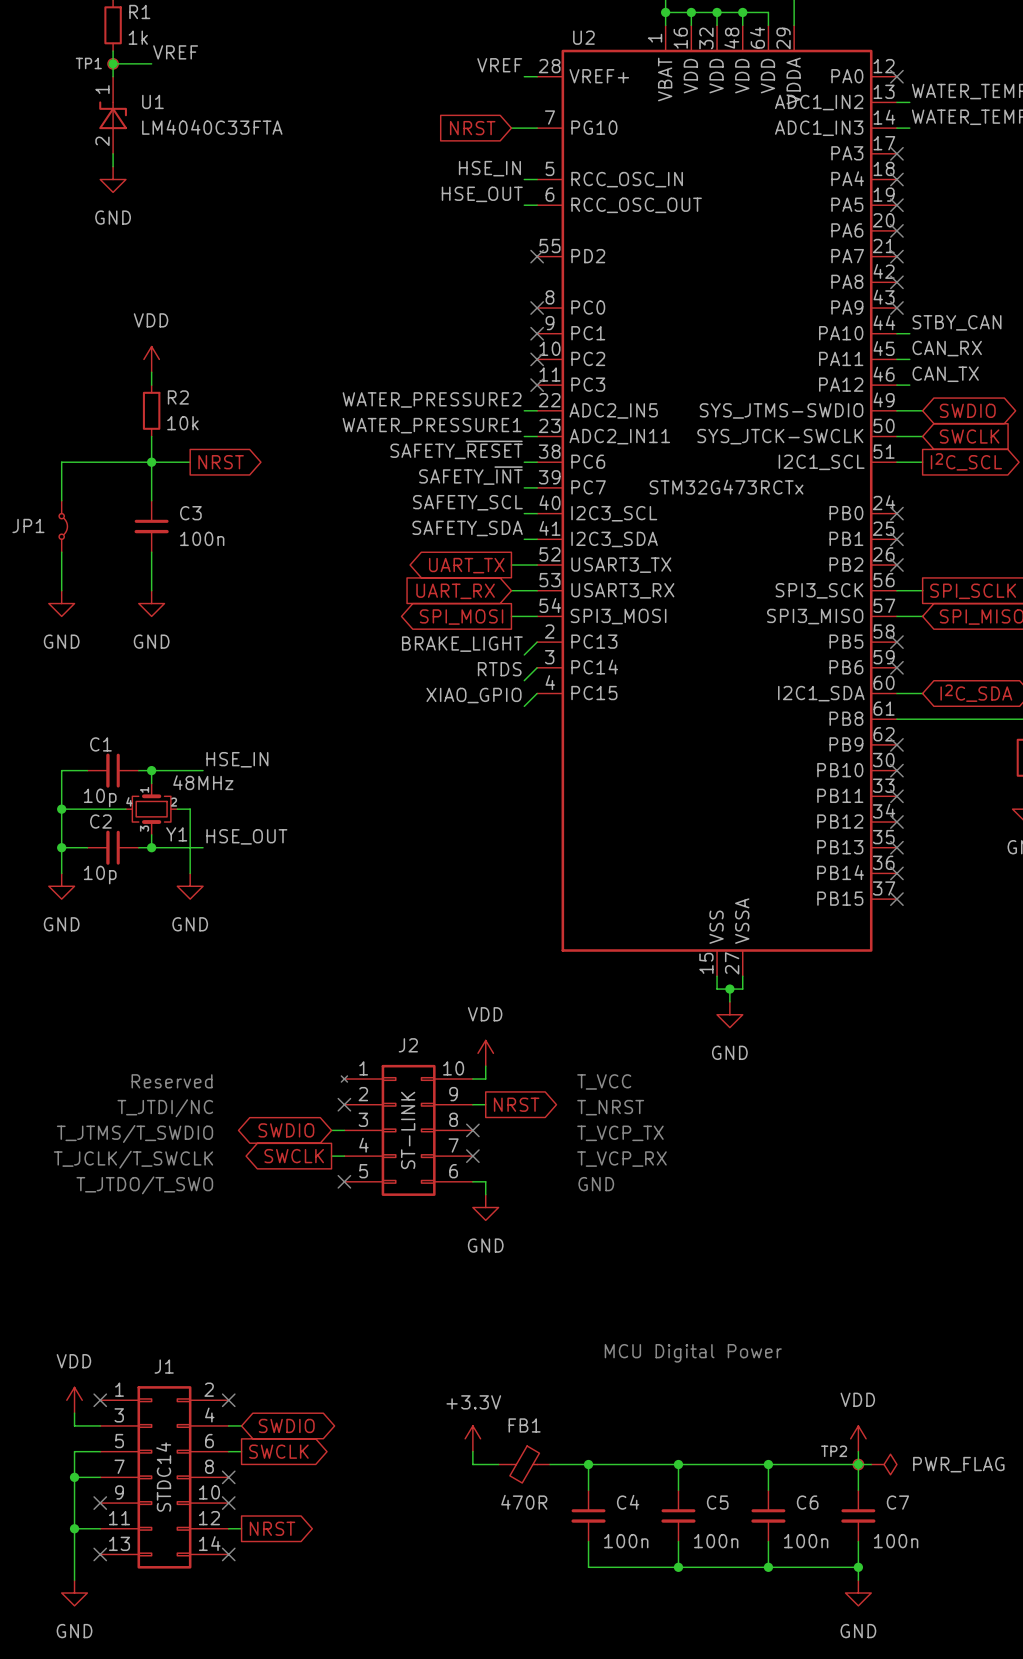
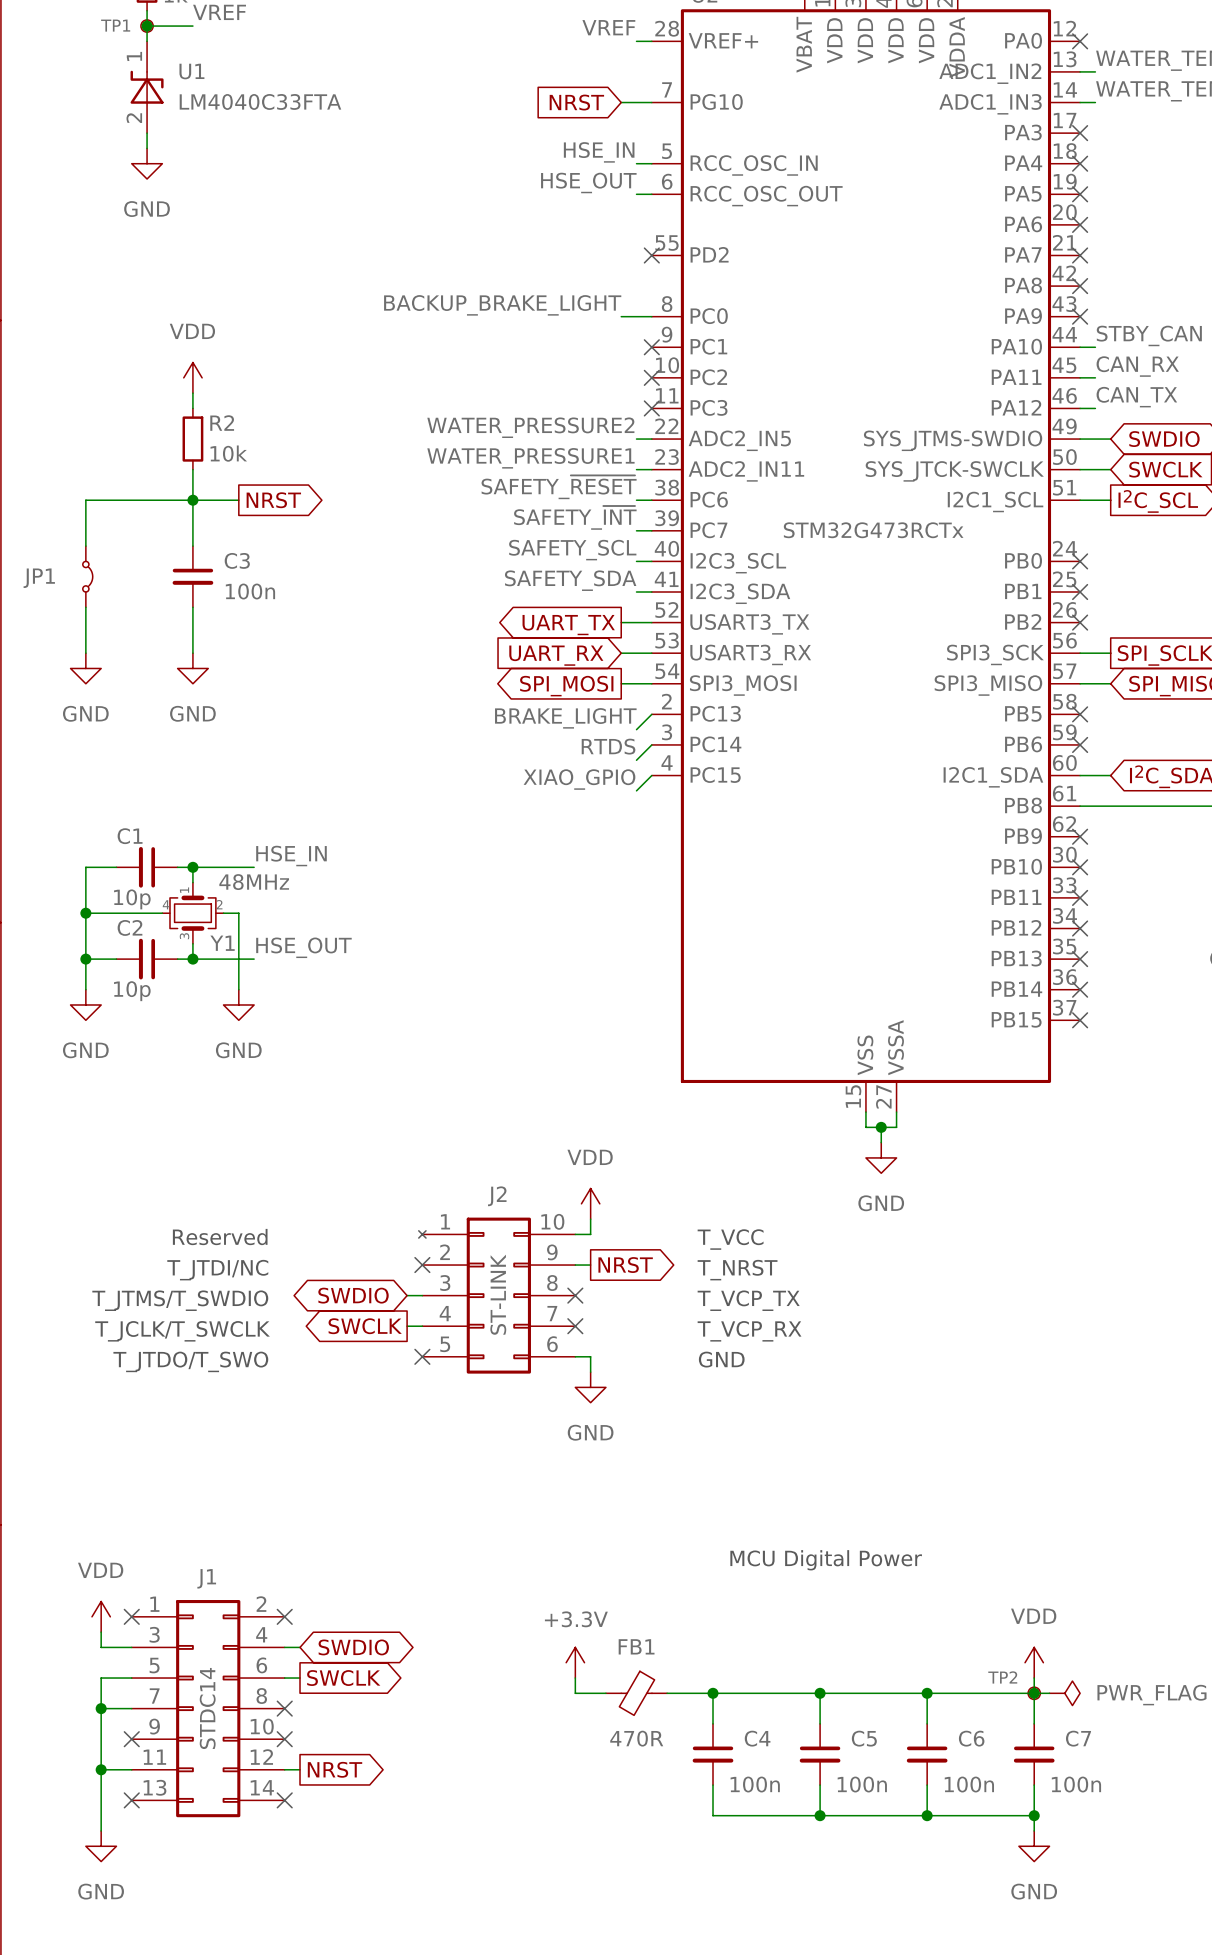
label: none -> BACKUP_BRAKE_LIGHT (502, 305)
wire: none -> (621, 316) (651, 316)
no-connect mark: (537, 308) -> none

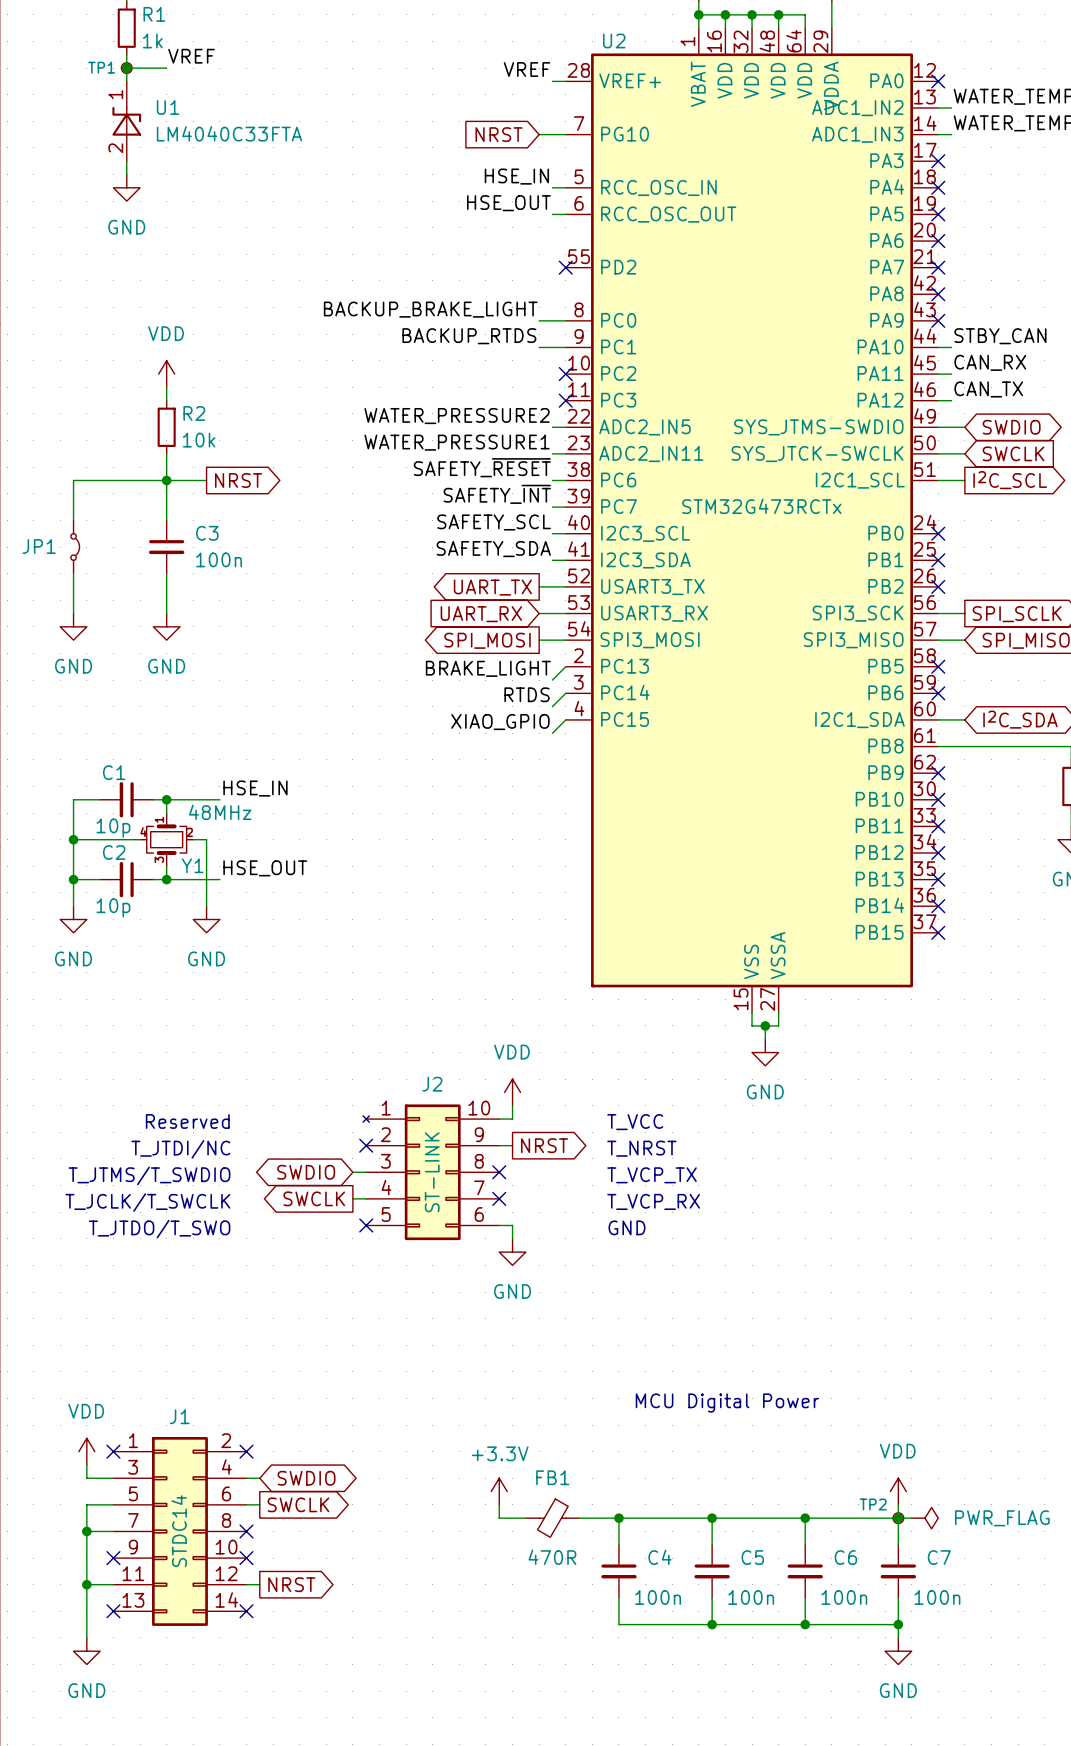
label: none -> BACKUP_RTDS (469, 336)
wire: none -> (539, 347) (565, 347)
no-connect mark: (651, 347) -> none

